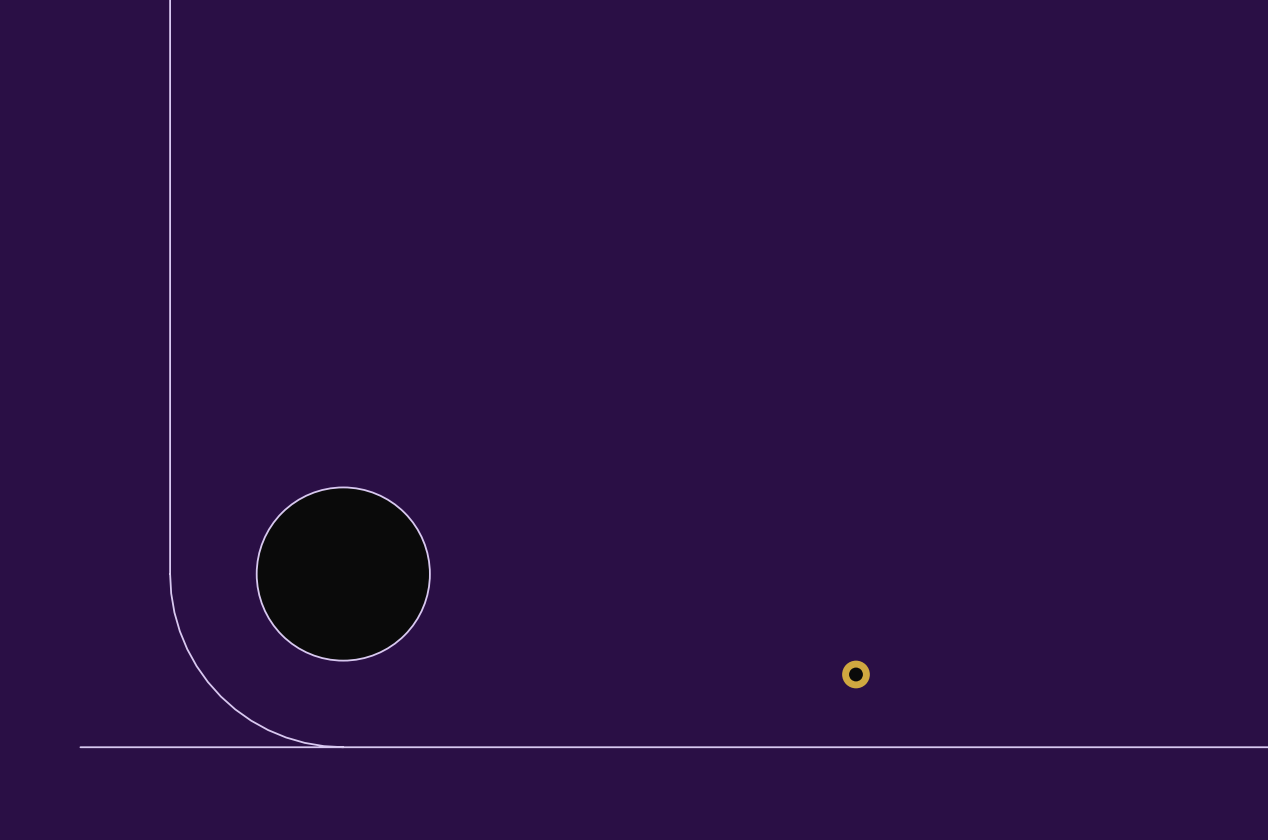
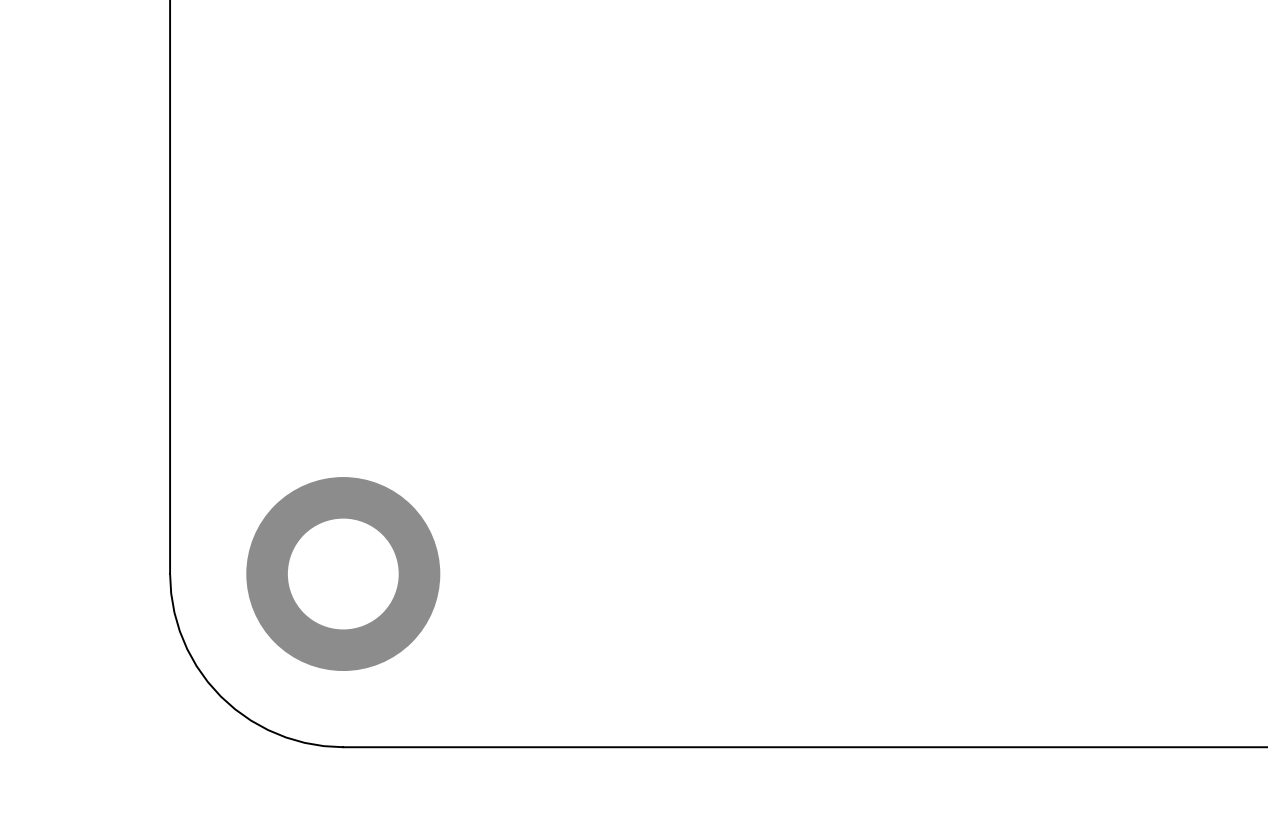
part footprint: [256, 487, 430, 661] -> [246, 477, 441, 672]
via: (855, 674) -> none
board edge: (343, 747) (80, 747) -> none

